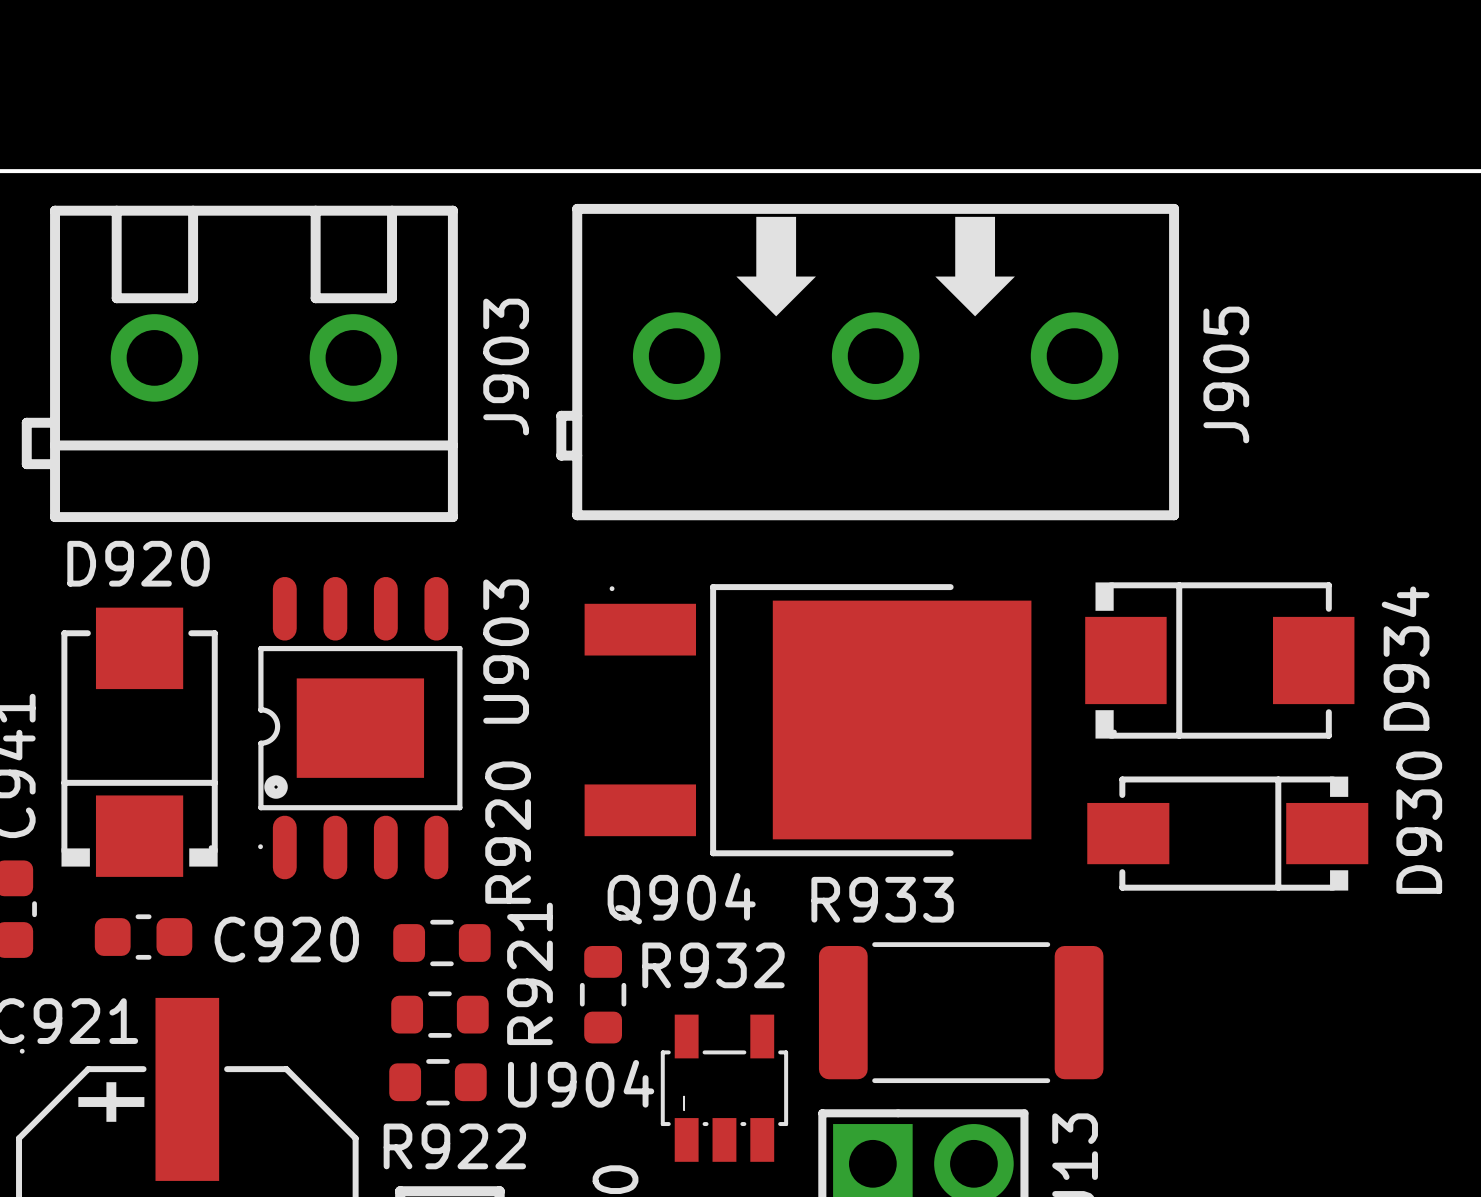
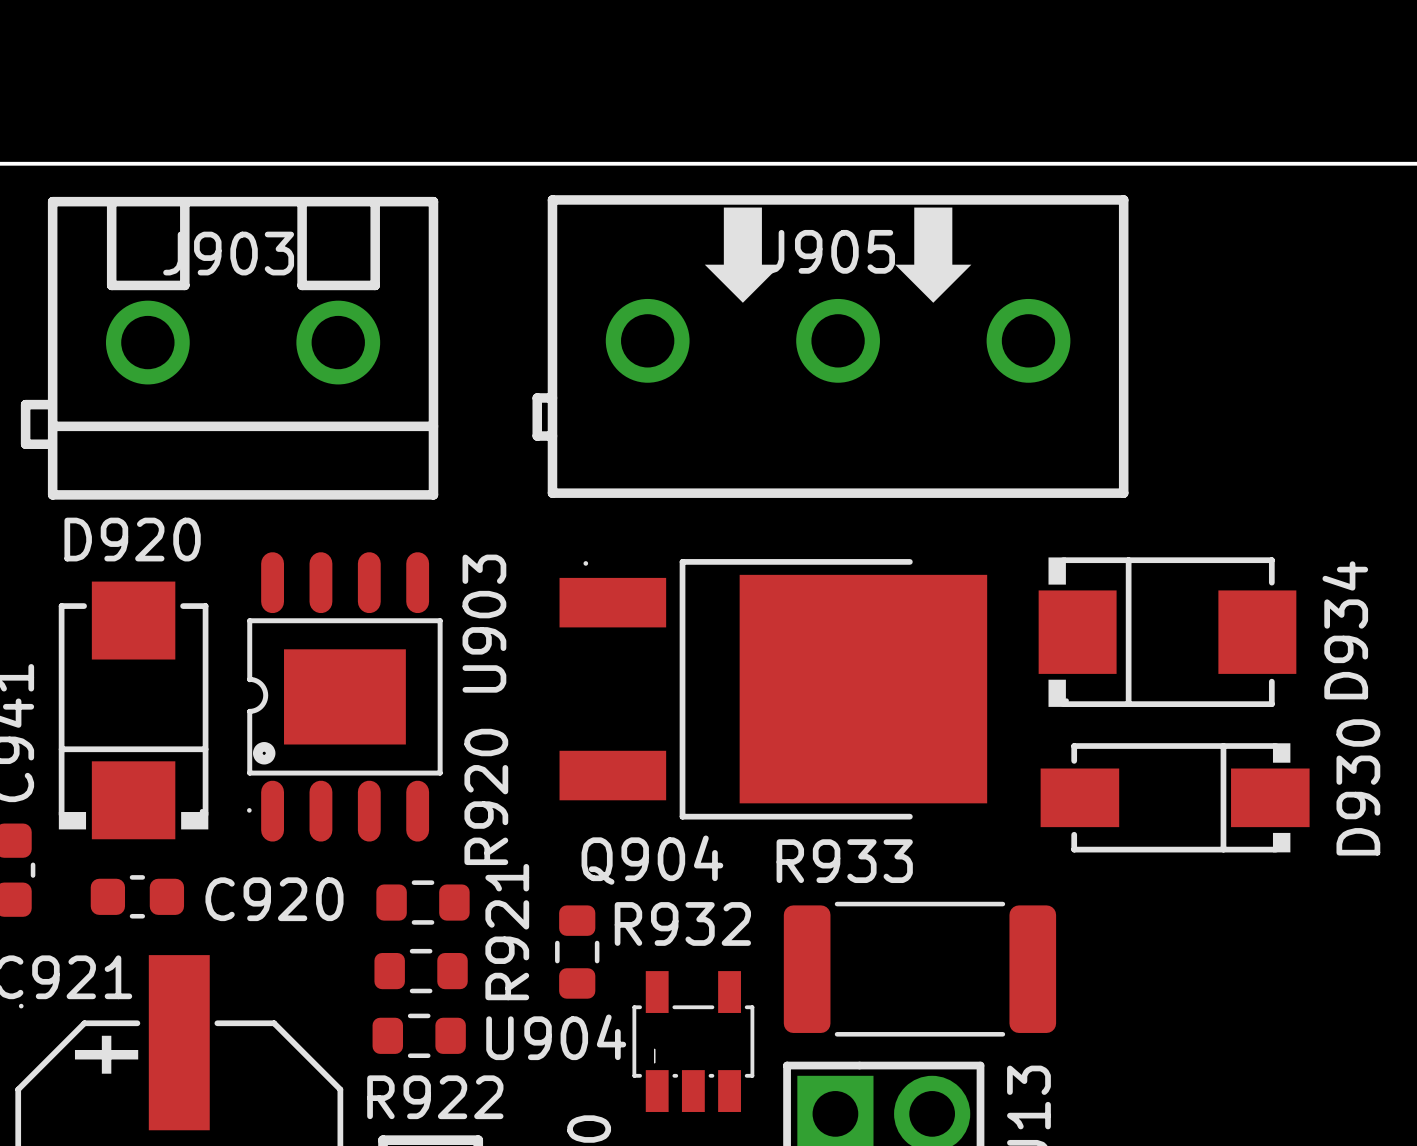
J903 name rotation: 0° (506, 367) -> 90° clockwise (228, 253)
J903 name position: J903 (506, 367) -> J903 (228, 253)
J905 name rotation: 0° (1226, 374) -> 90° clockwise (829, 251)
J905 name position: J905 (1226, 374) -> J905 (829, 251)

